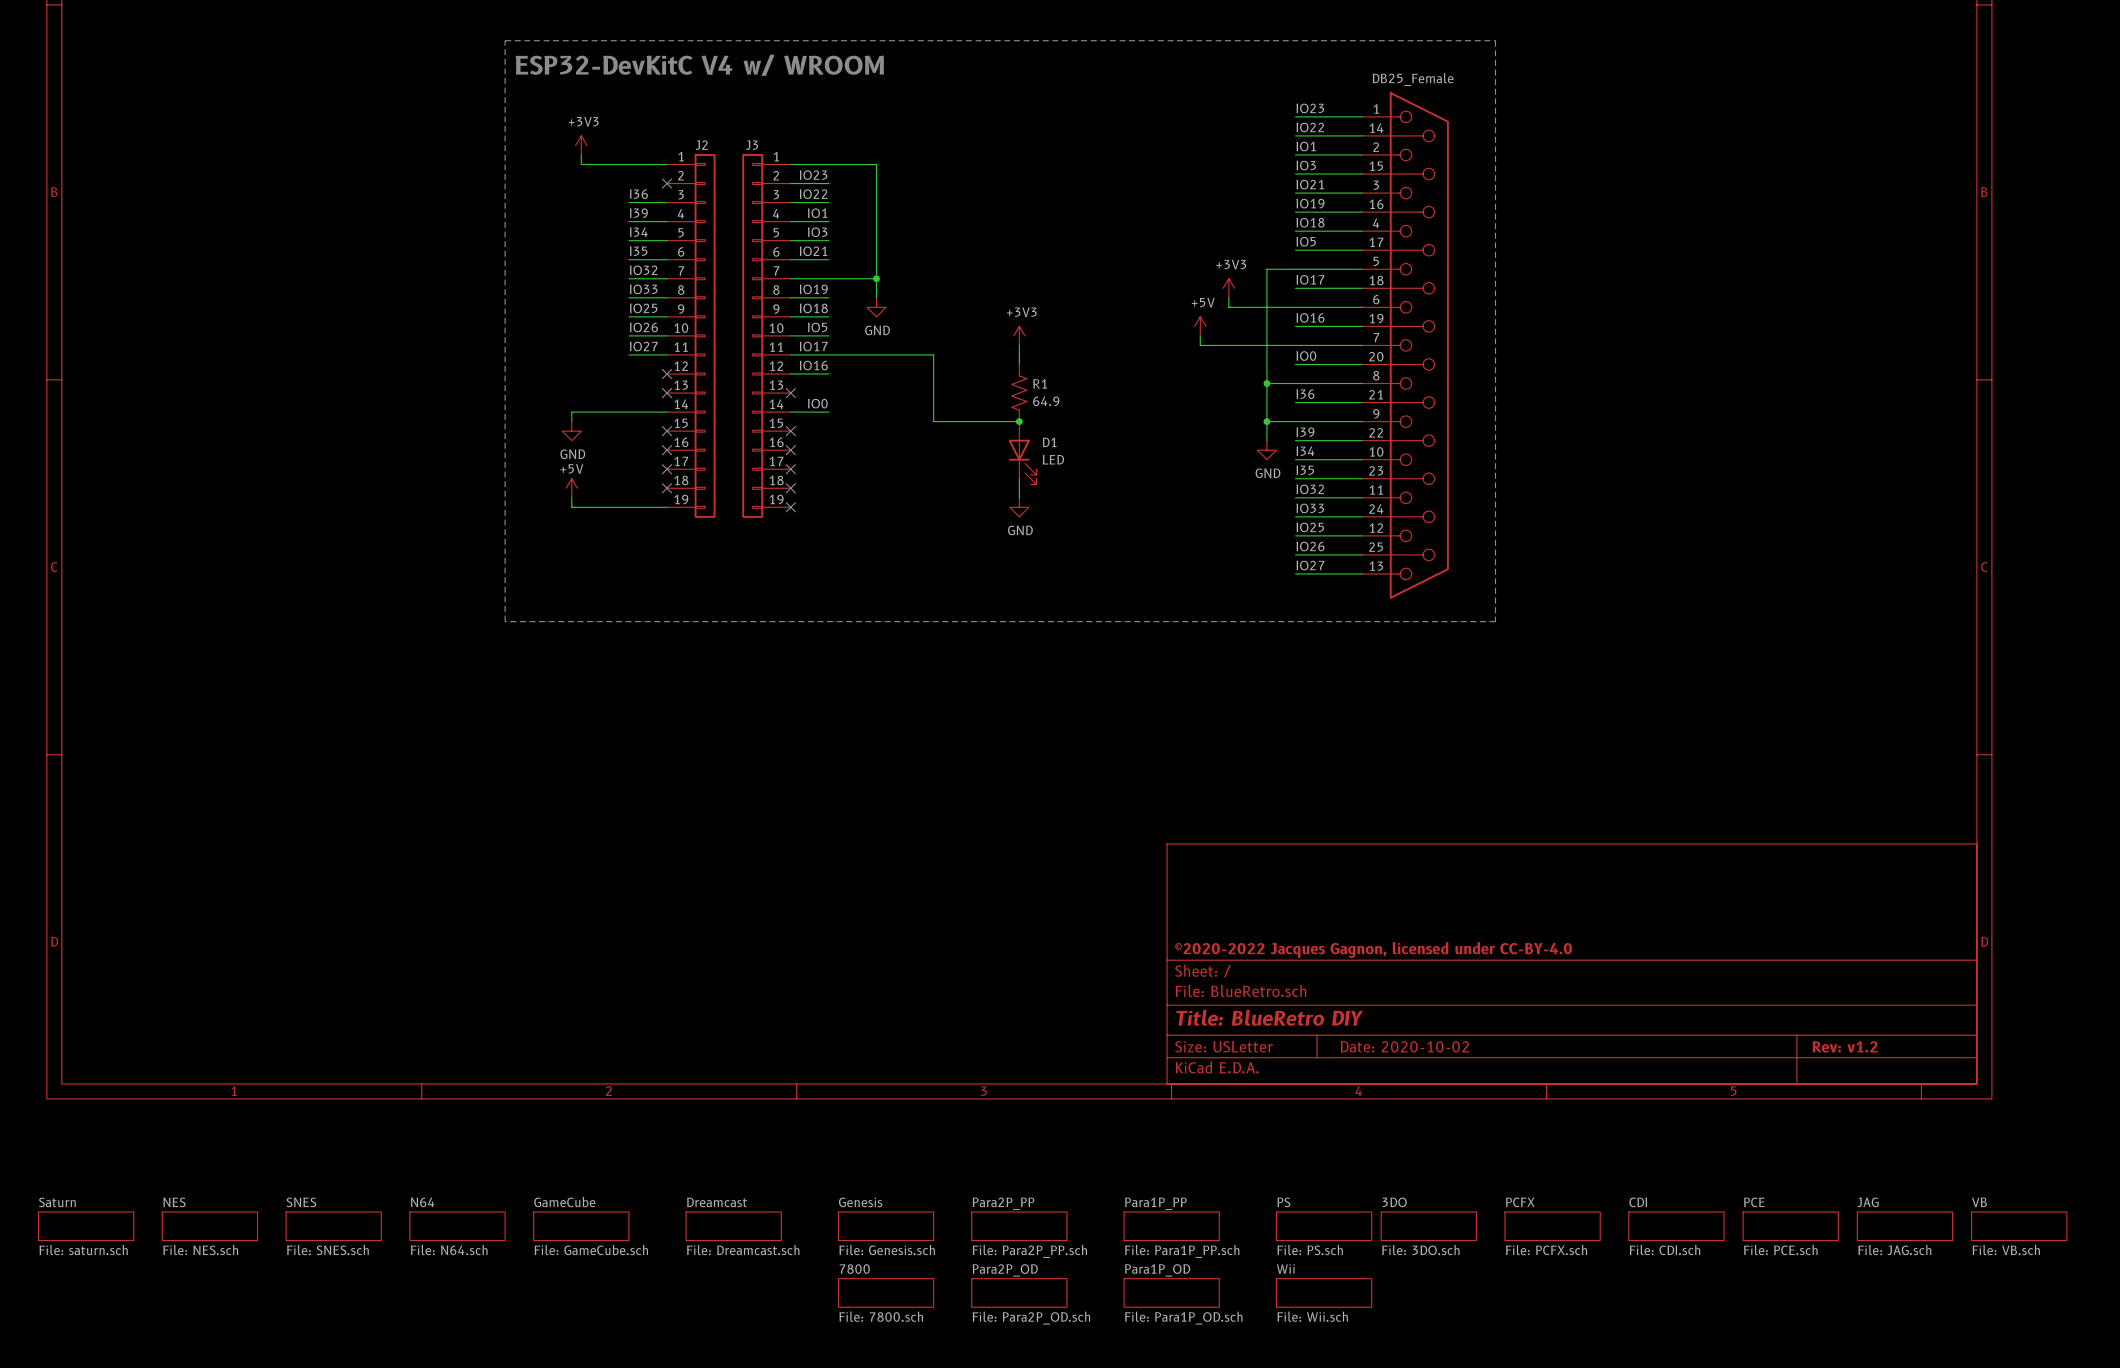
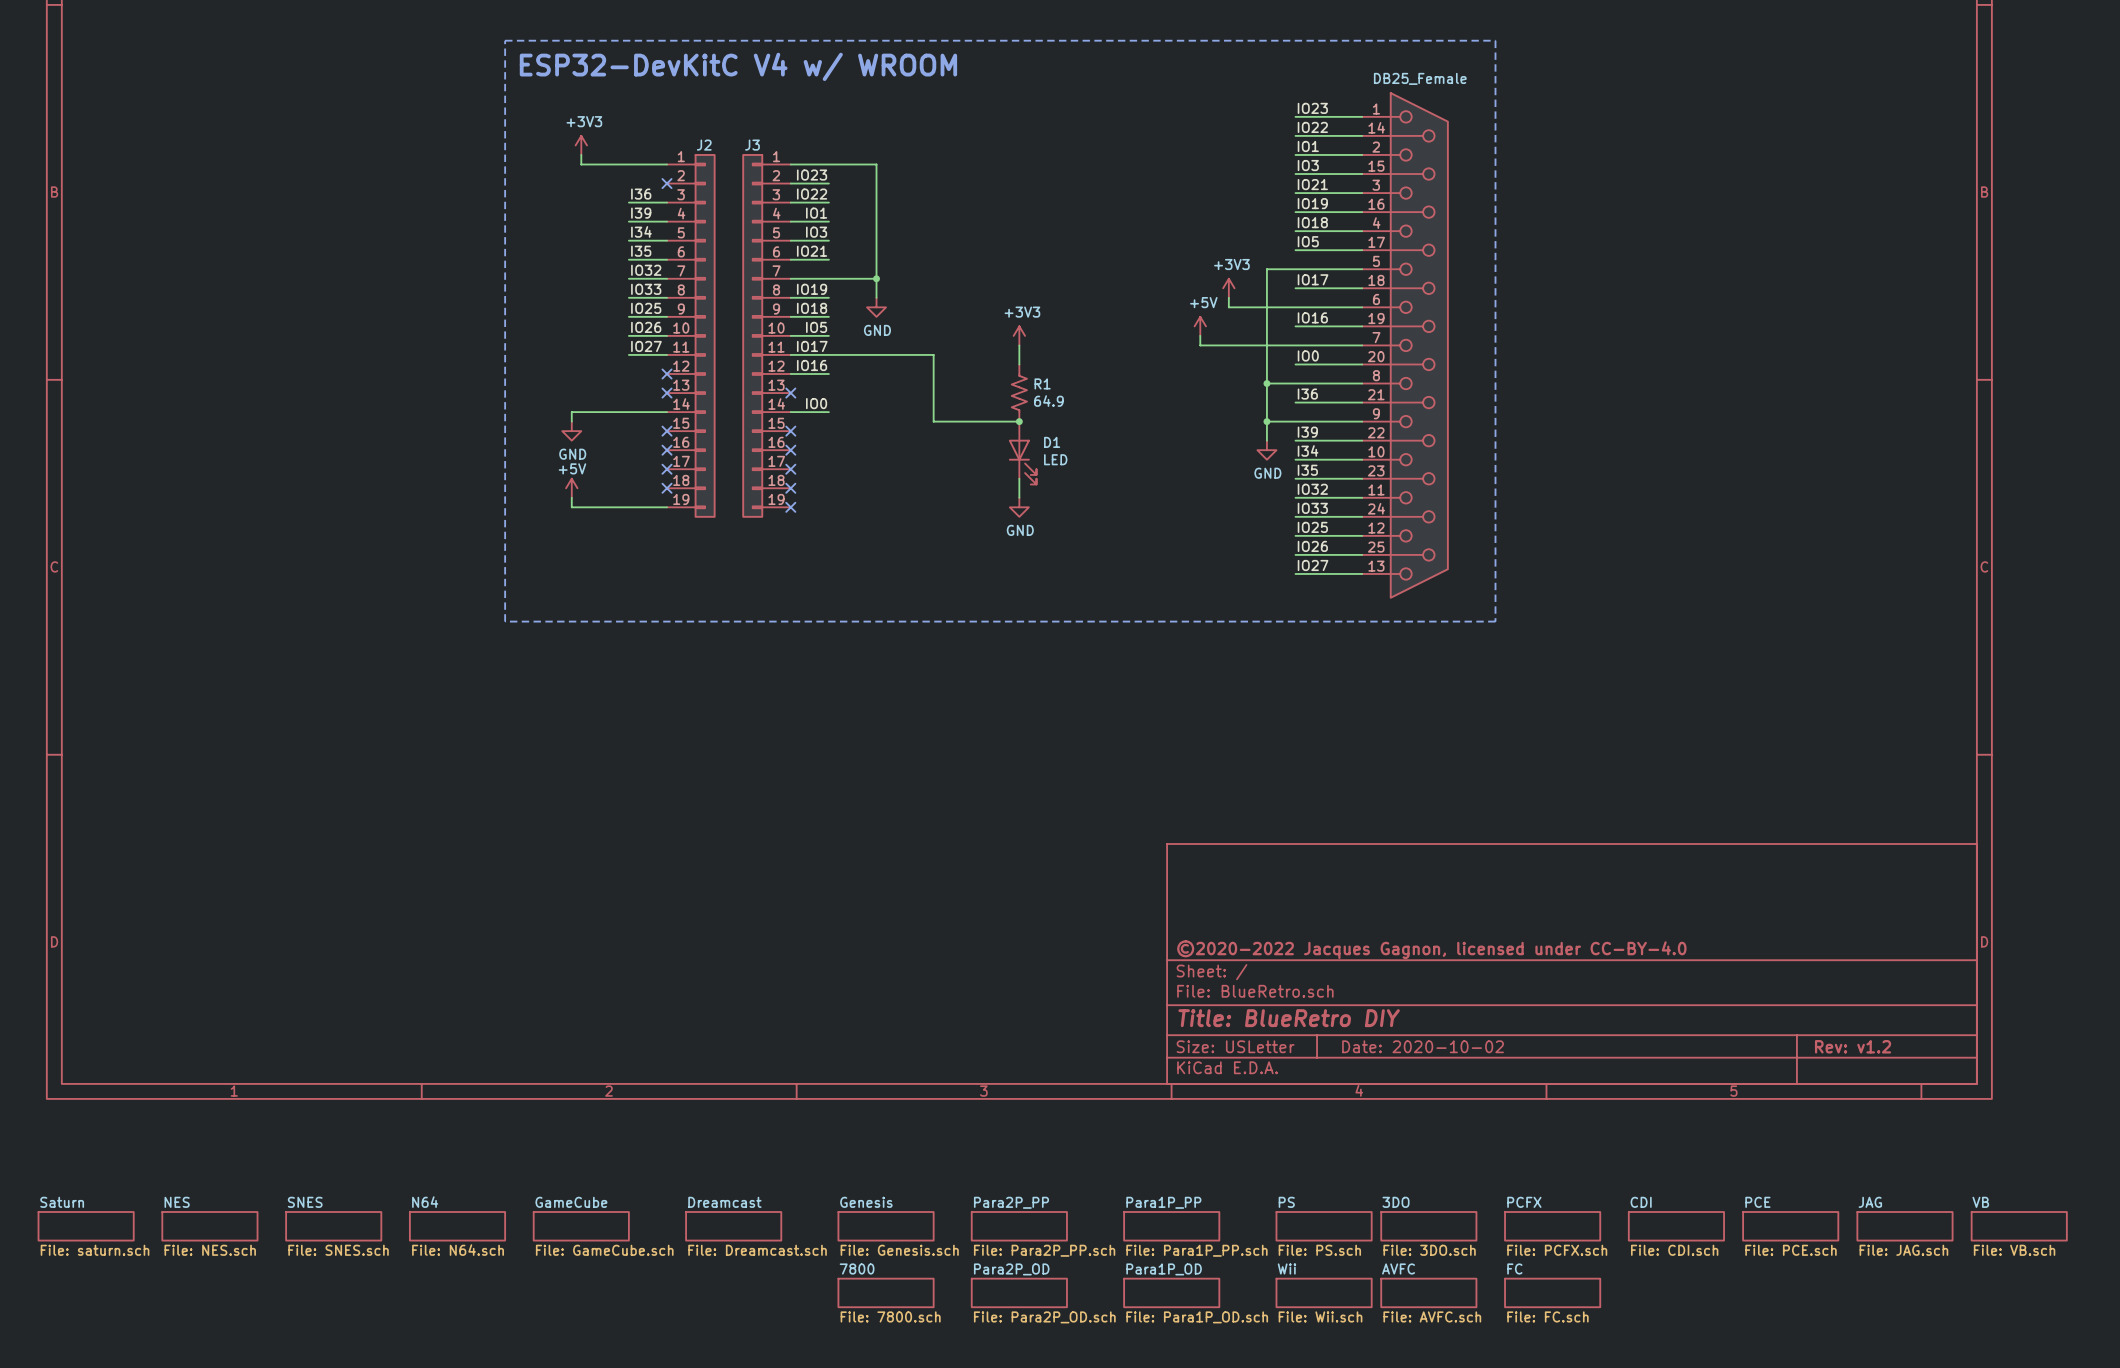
sheet AVFC: none -> File: AVFC.sch (1428, 1292)
sheet FC: none -> File: FC.sch (1552, 1292)

